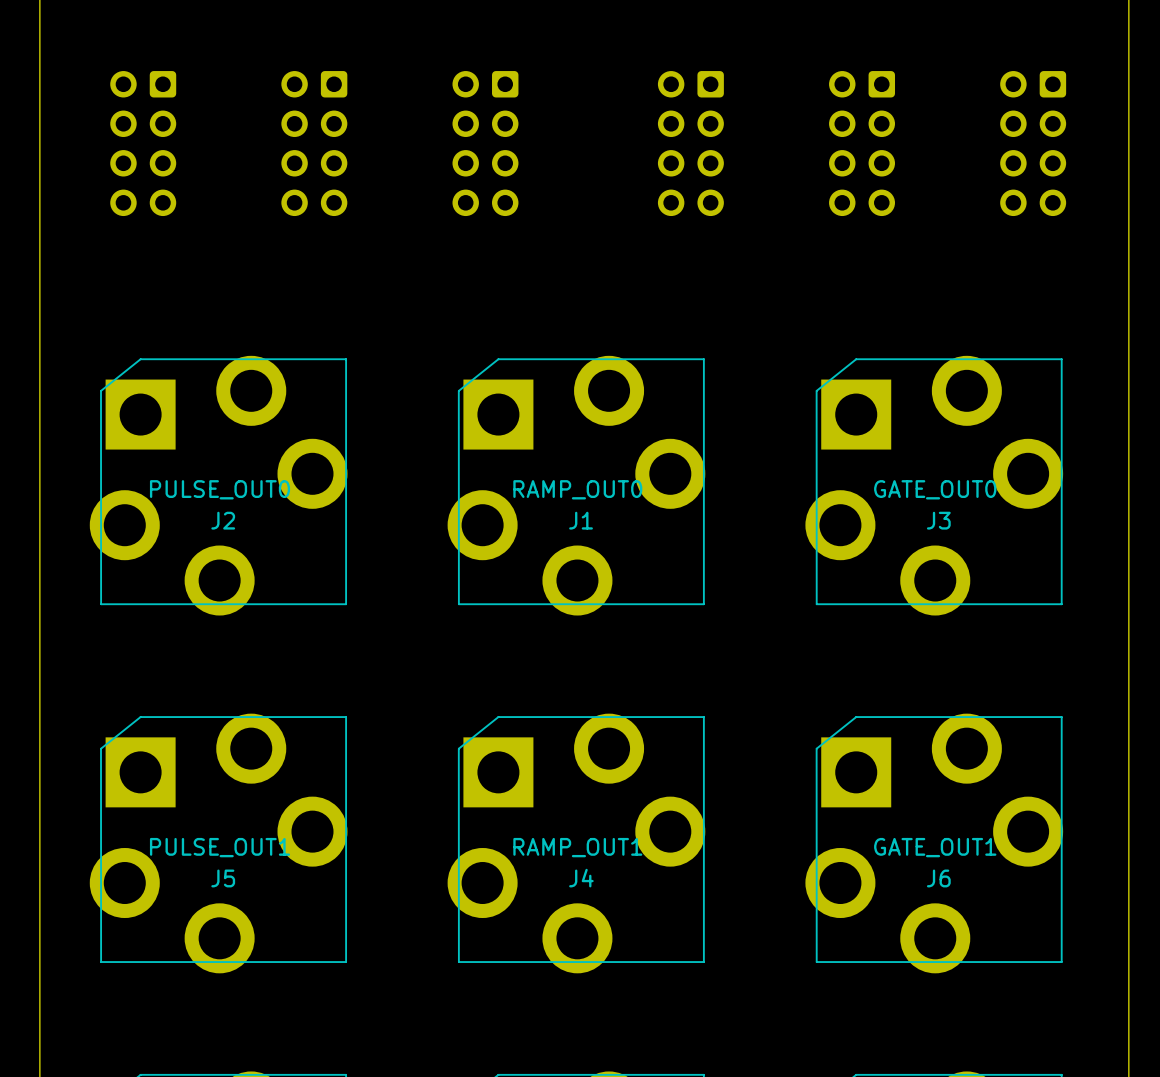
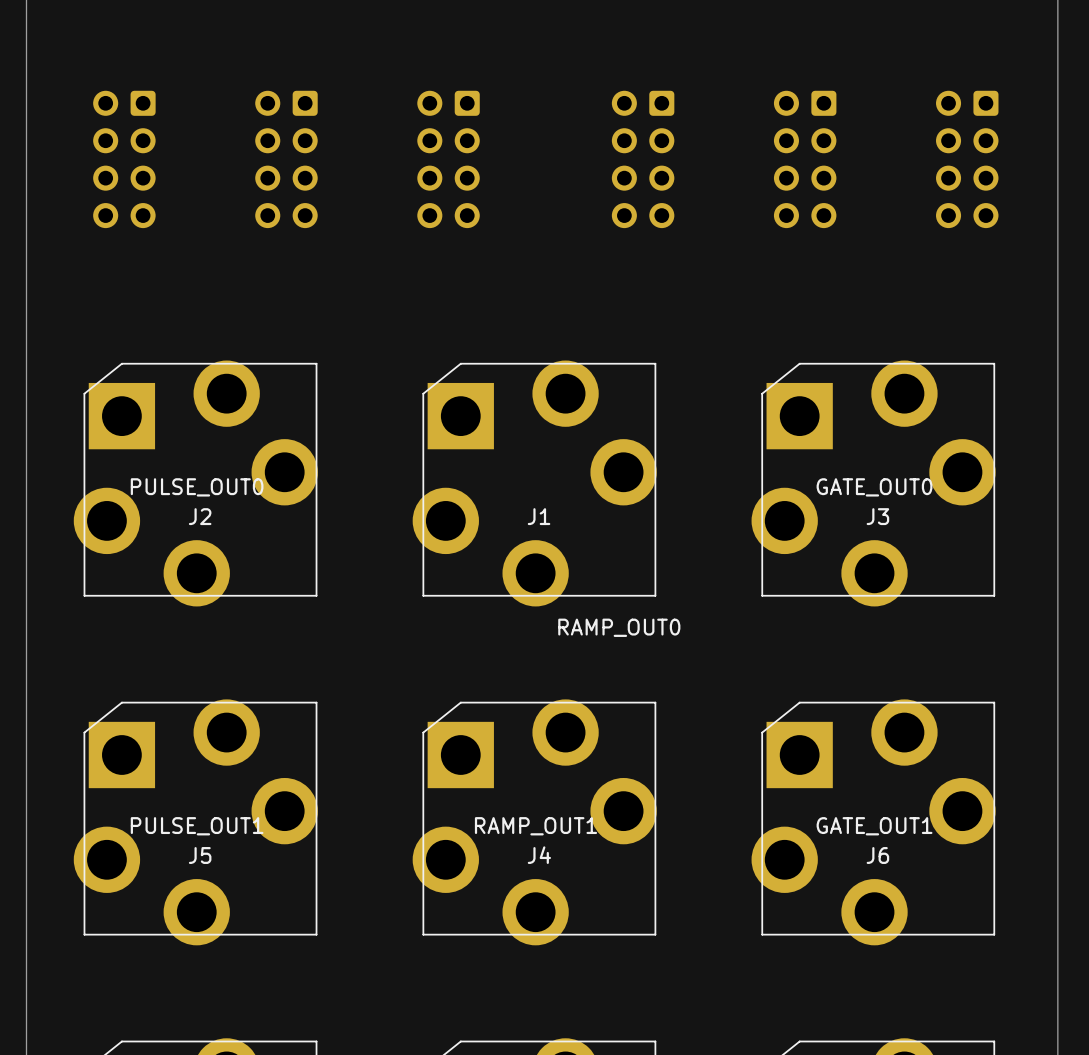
J1 value position: RAMP_OUT0 (577, 489) -> RAMP_OUT0 (619, 627)

